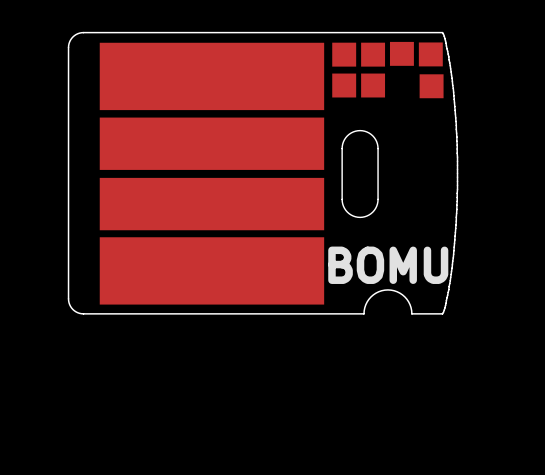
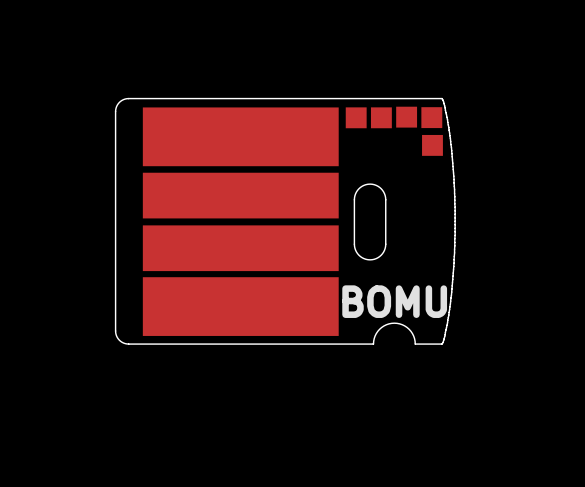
part: (344, 85) -> none
part: (373, 85) -> none

